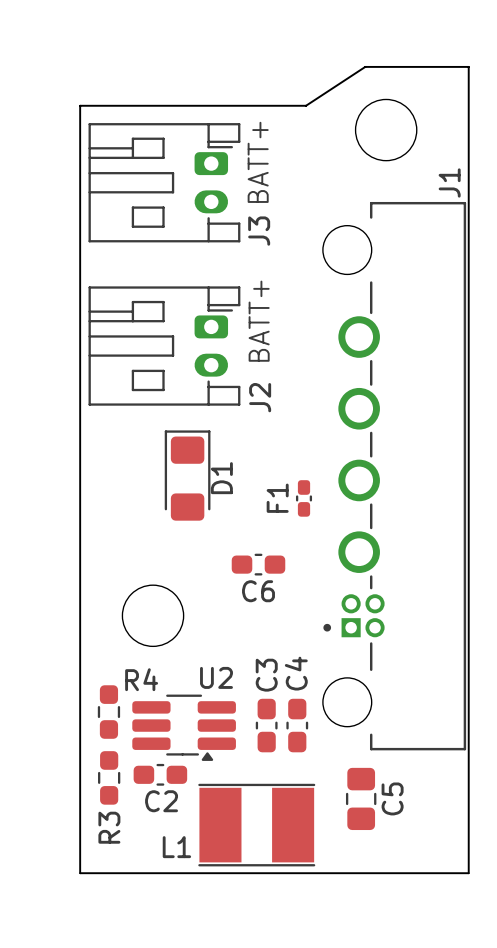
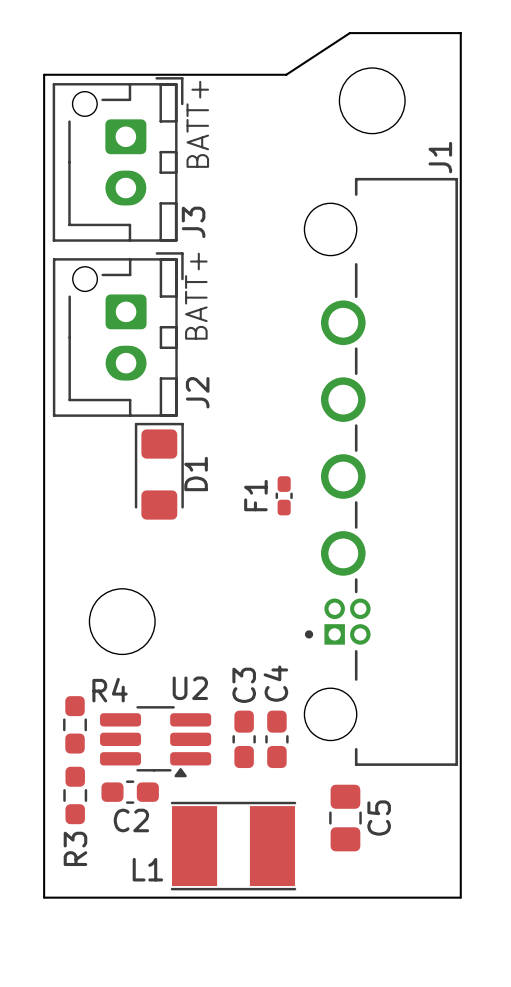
J3 footprint: [88, 123, 241, 243] -> [52, 77, 184, 242]
text position: BATT+ (258, 162) -> BATT+ (197, 124)
J2 footprint: [88, 286, 241, 406] -> [52, 252, 184, 417]
text position: BATT+ (259, 321) -> BATT+ (196, 296)
C6: (258, 564) -> none

